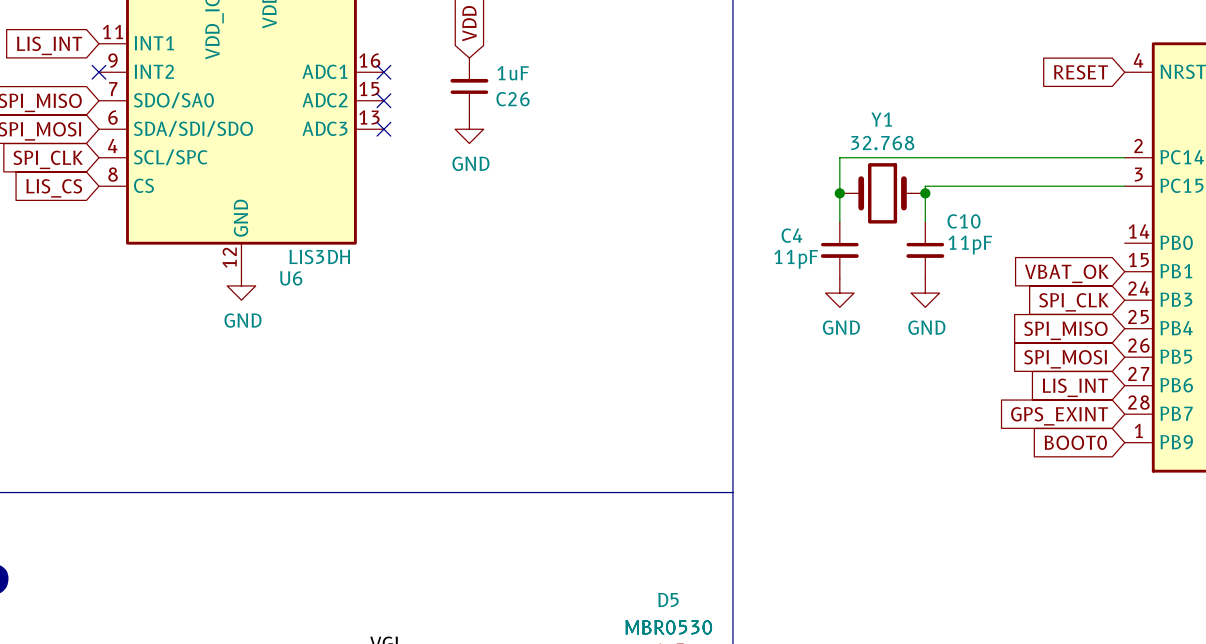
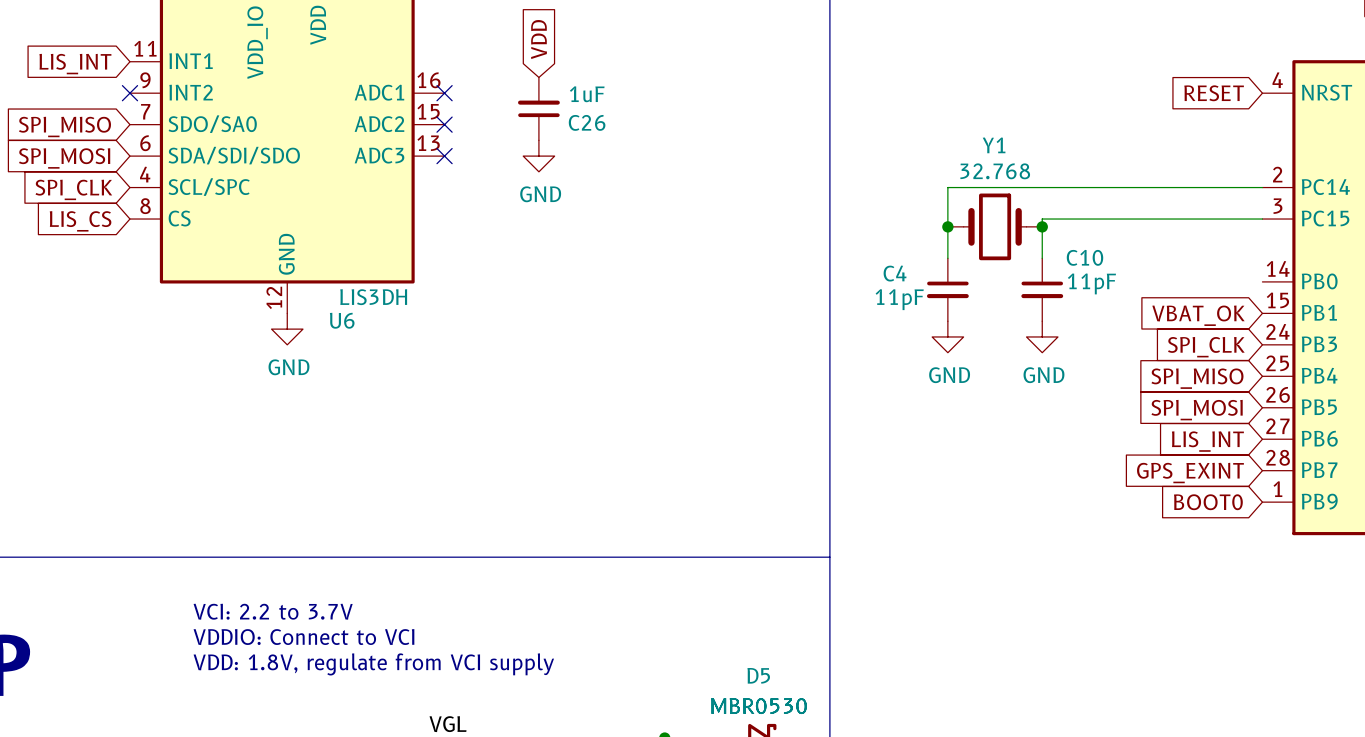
text: none -> VCI: 2.2 to 3.7V (273, 611)
text: none -> VDDIO: Connect to VCI (303, 637)
text: none -> VDD: 1.8V, regulate from VCI supply (373, 664)

